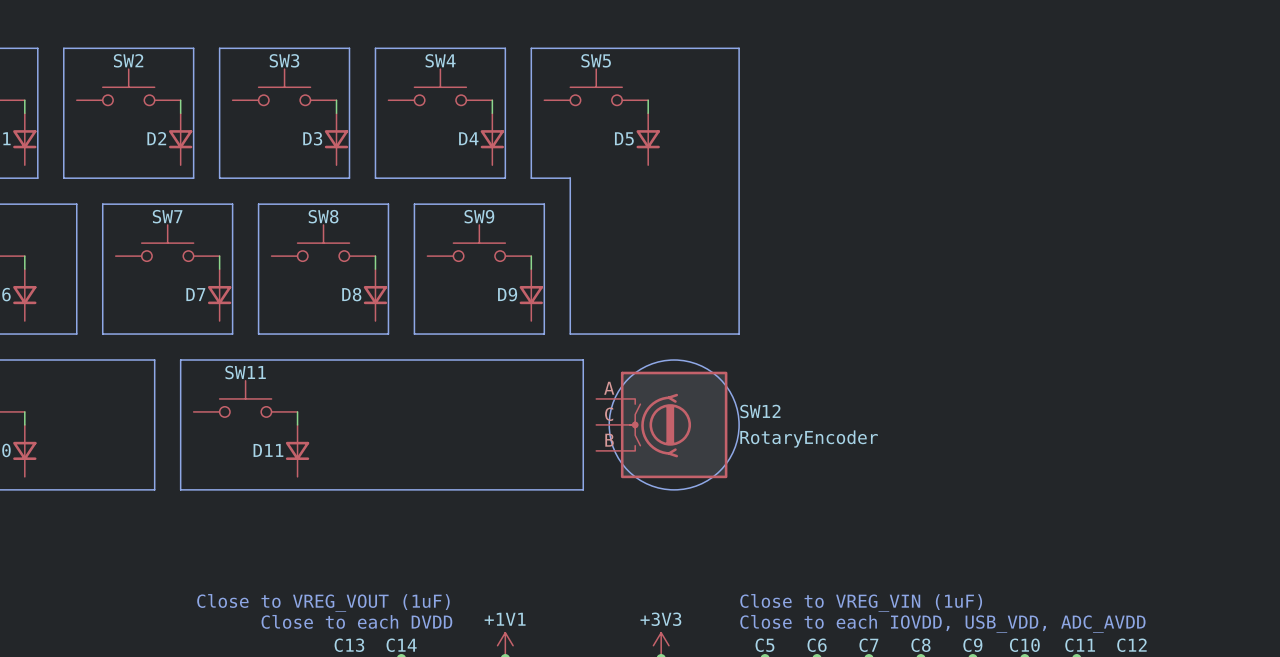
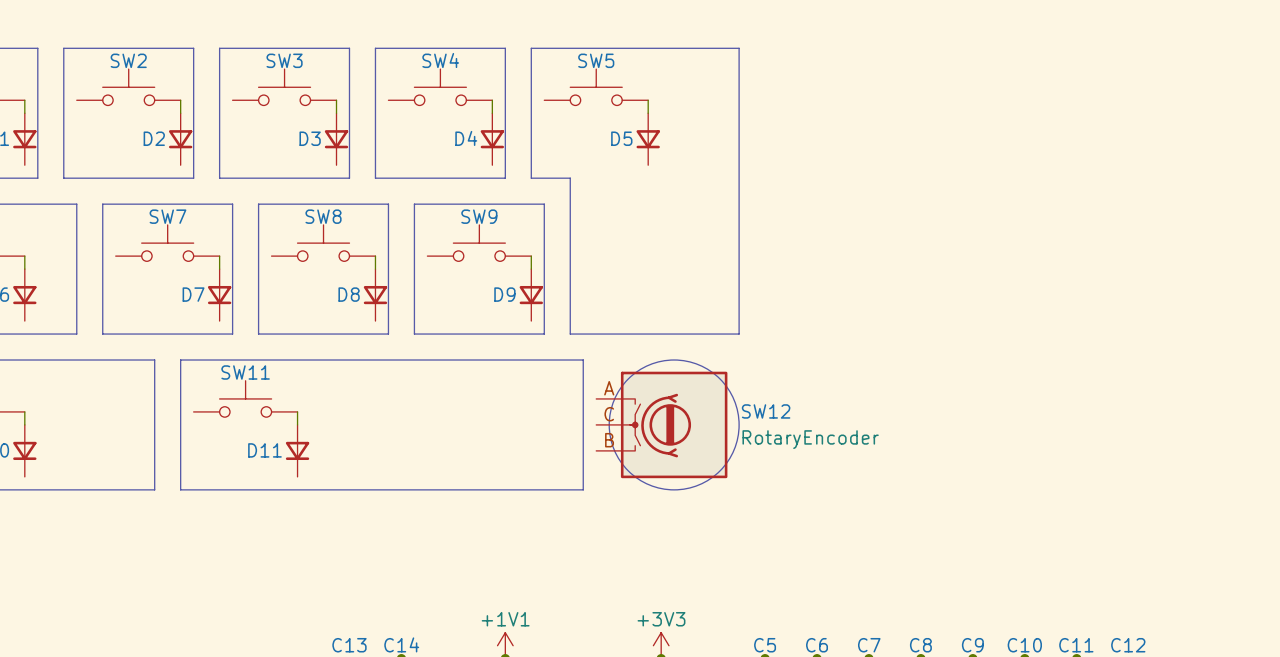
text: Close to VREG_VOUT (1uF) (323, 602) -> none
text: Close to VREG_VIN (1uF) (861, 602) -> none
text: Close to each DVDD (356, 621) -> none
text: Close to each IOVDD, USB_VDD, ADC_AVDD (942, 623) -> none

